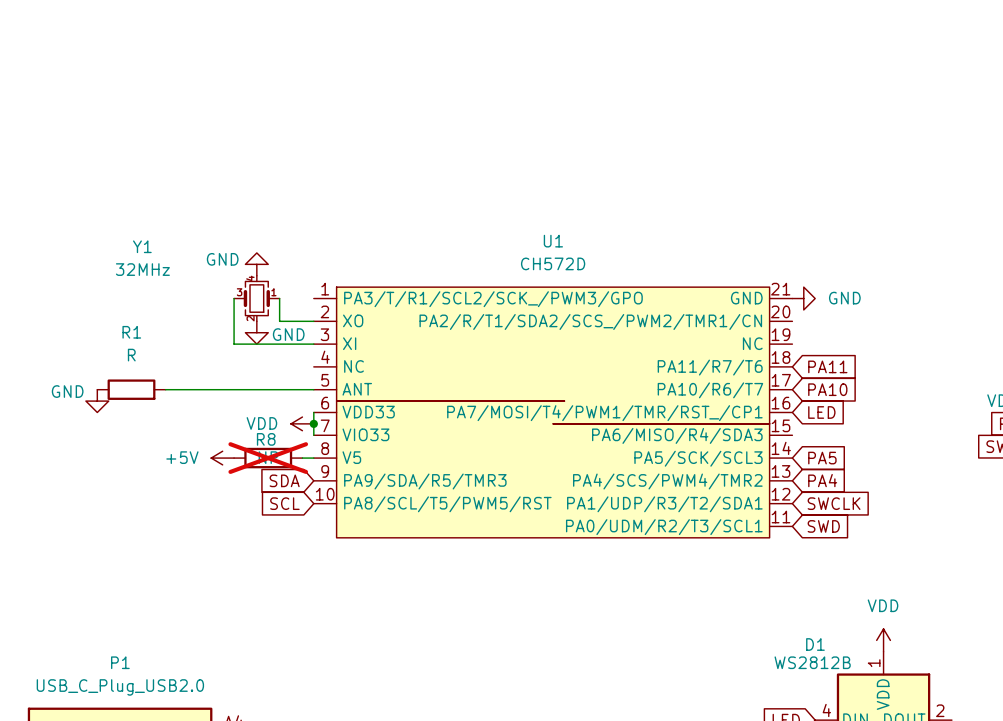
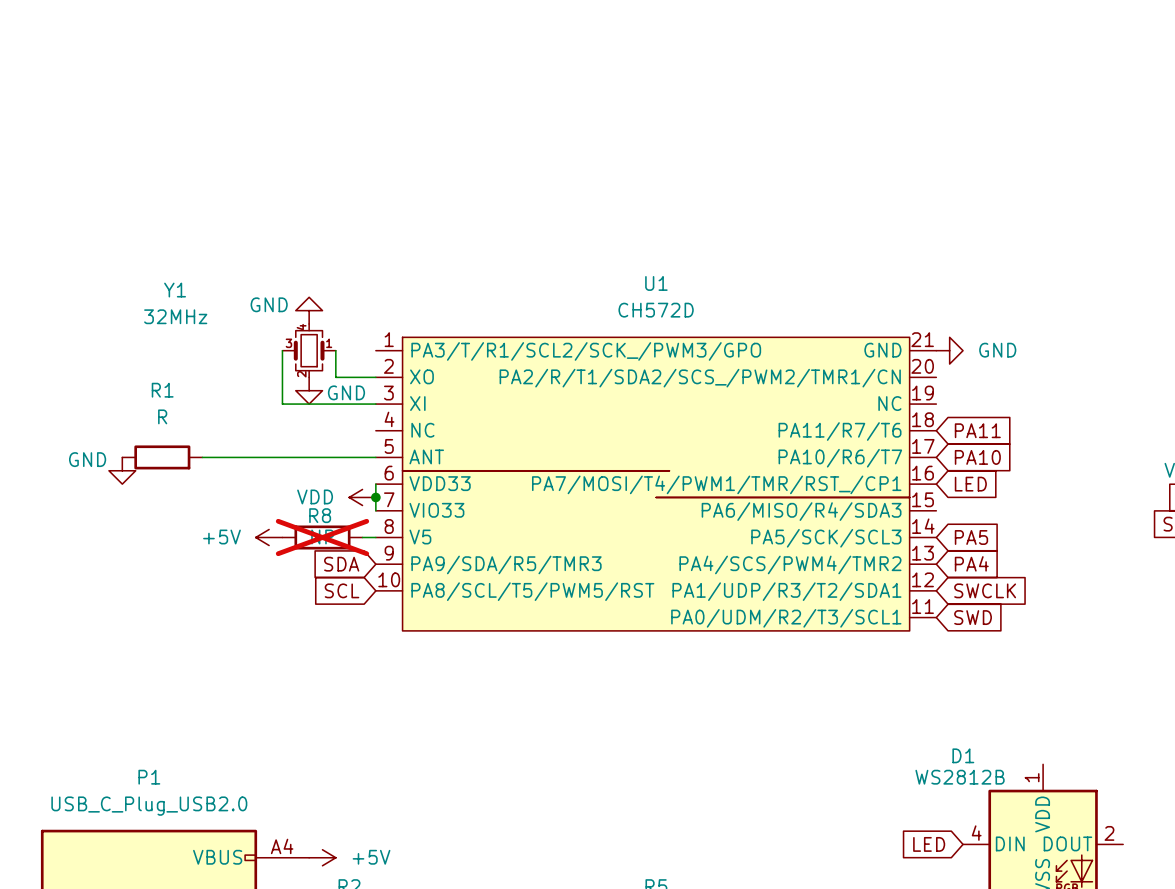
power symbol: VDD (883, 640) -> none

